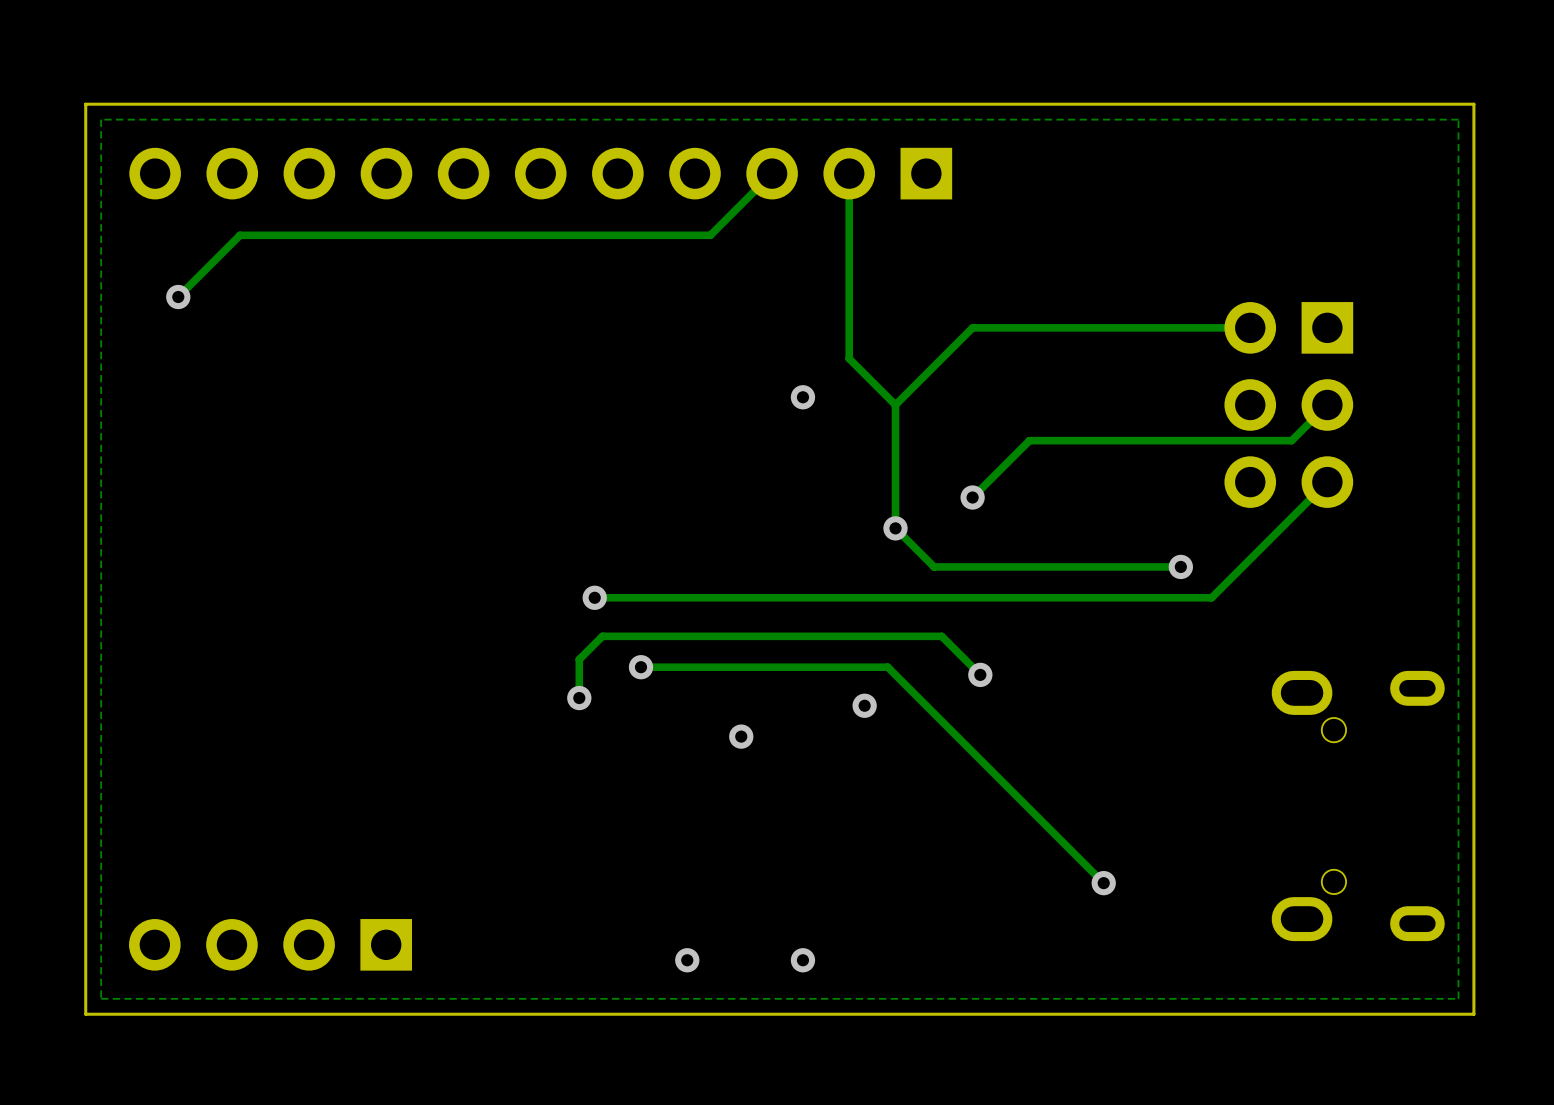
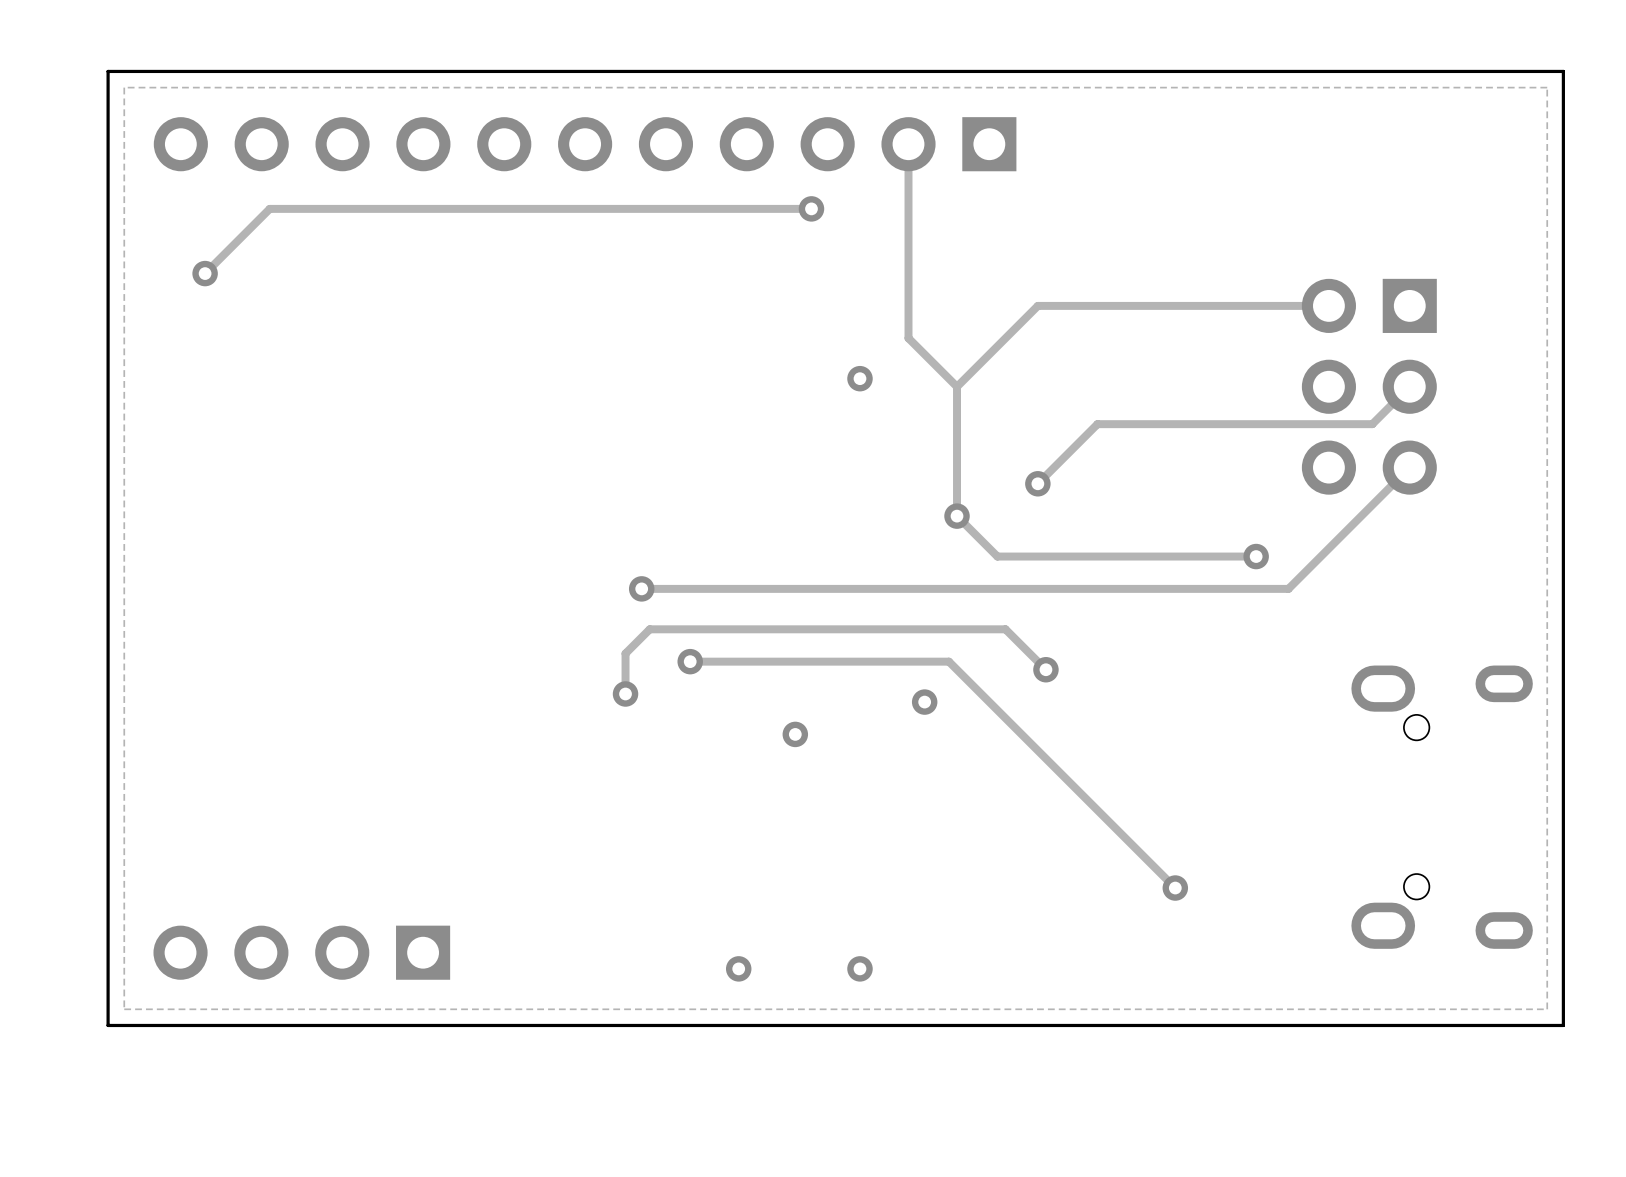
track: (772, 173) (710, 235) -> (811, 208) (762, 208)
via: none -> (811, 208)

